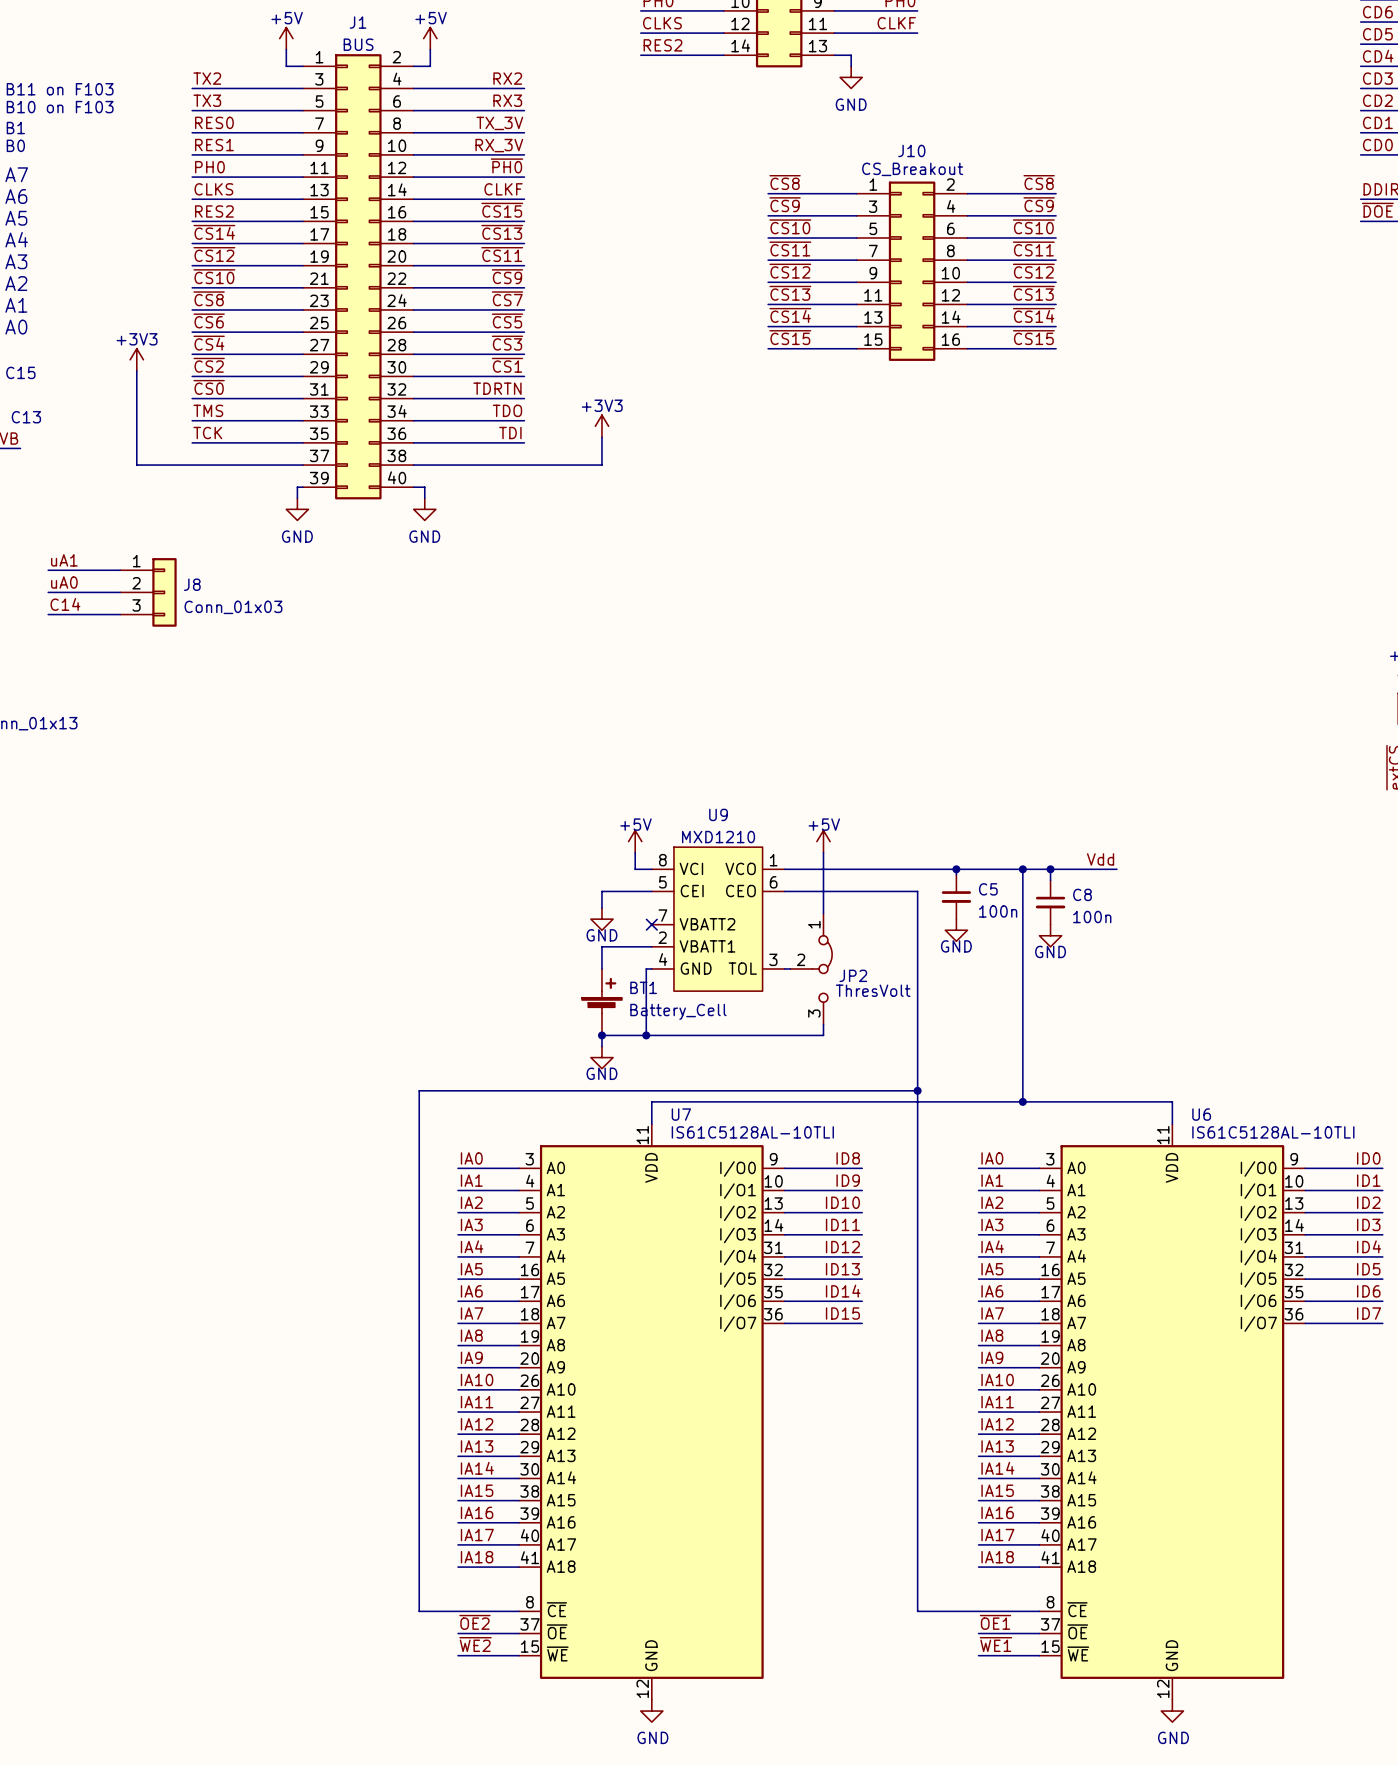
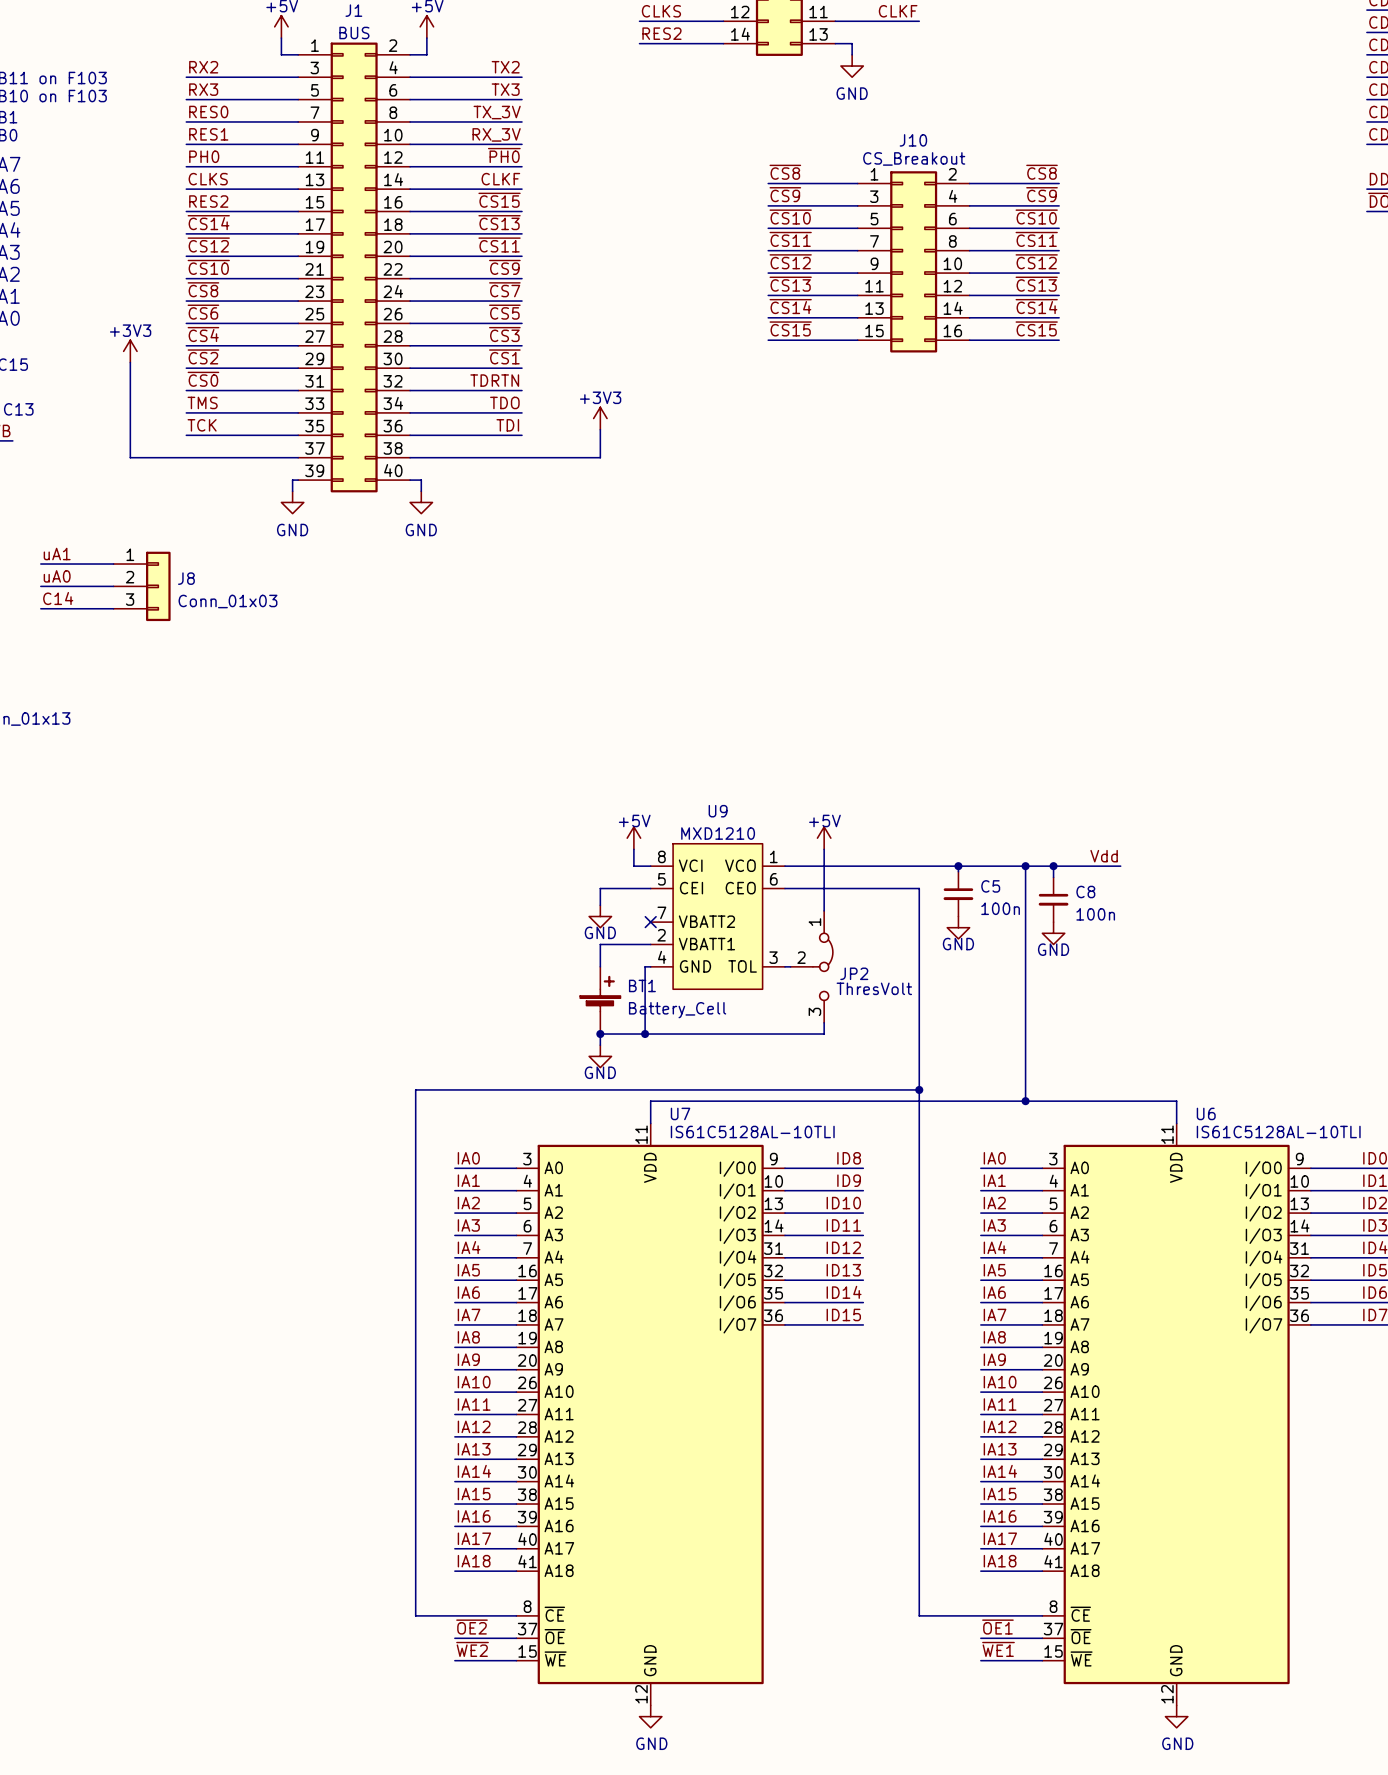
label: TX2 (207, 78) -> RX2 (203, 67)
label: RX2 (507, 78) -> TX2 (505, 67)
label: TX3 (207, 100) -> RX3 (203, 89)
label: RX3 (507, 100) -> TX3 (505, 89)

